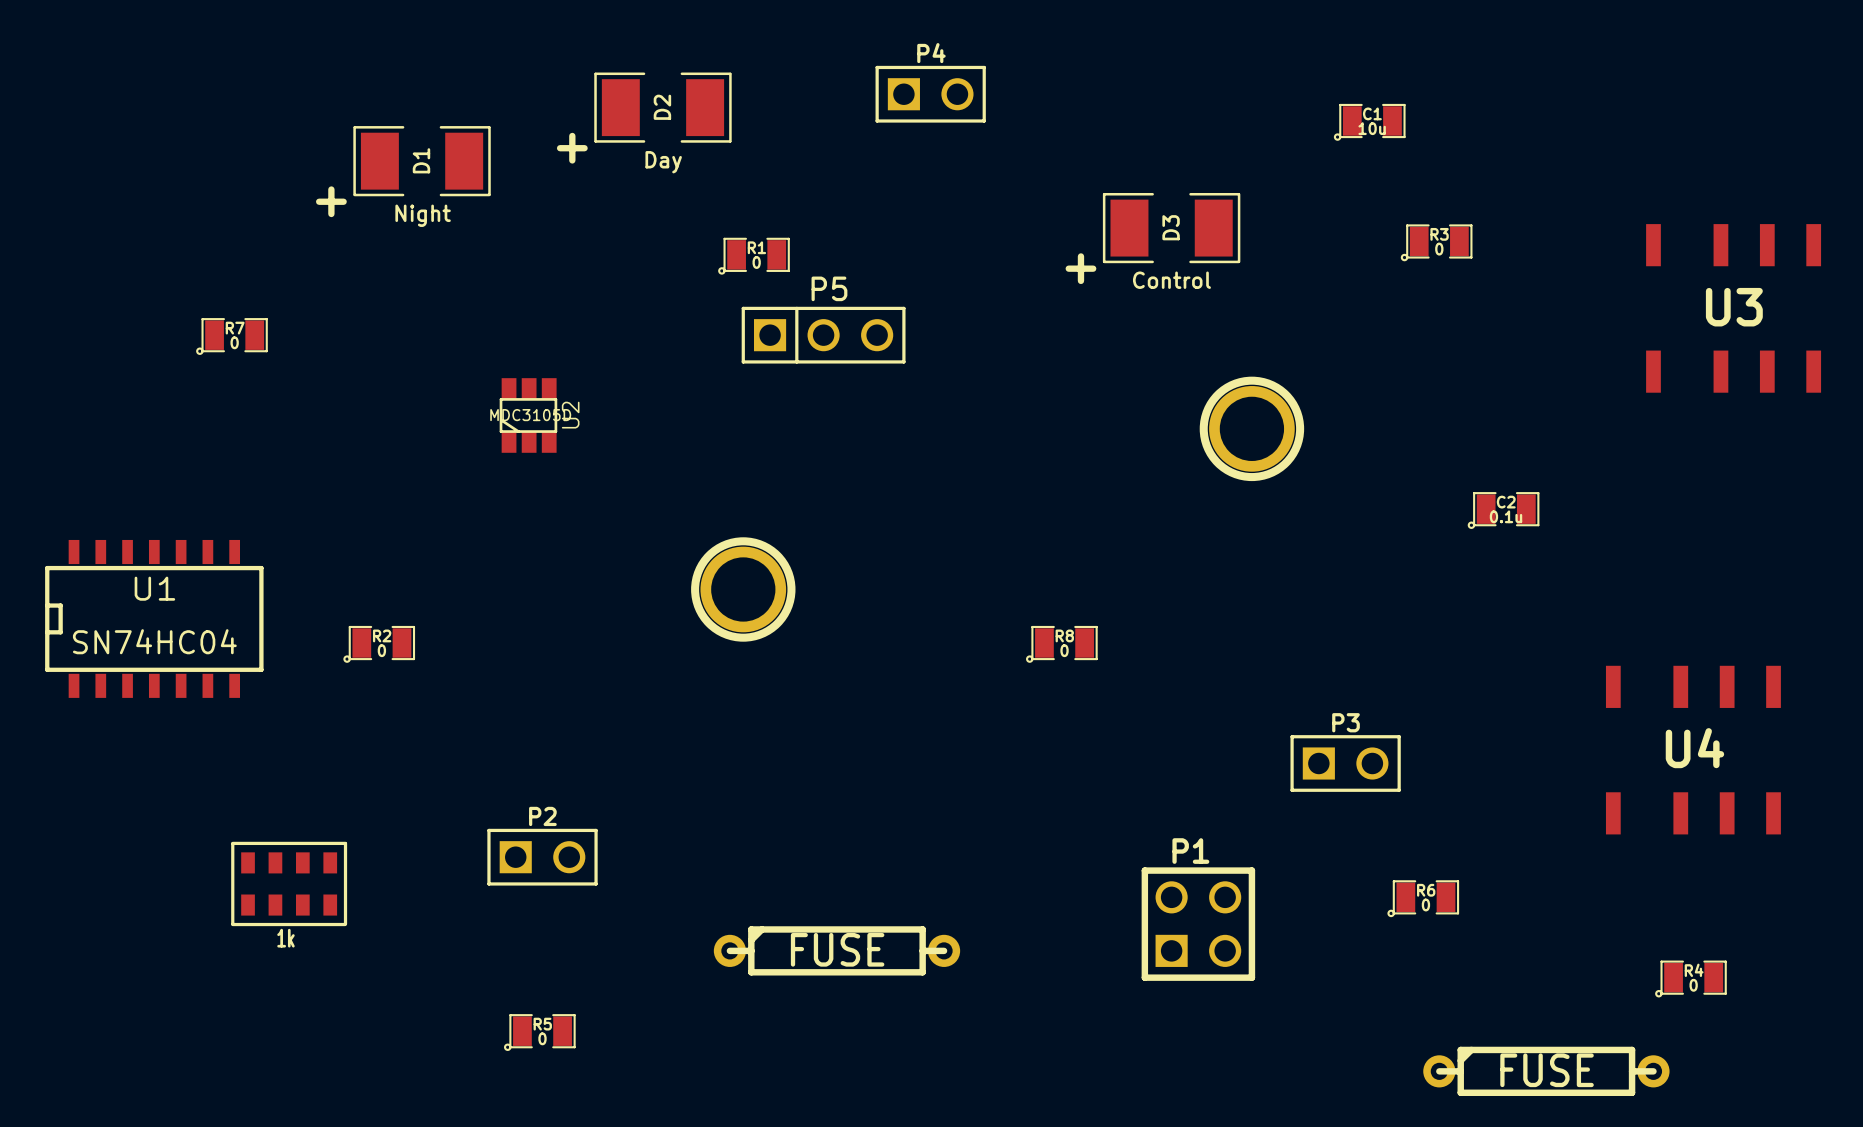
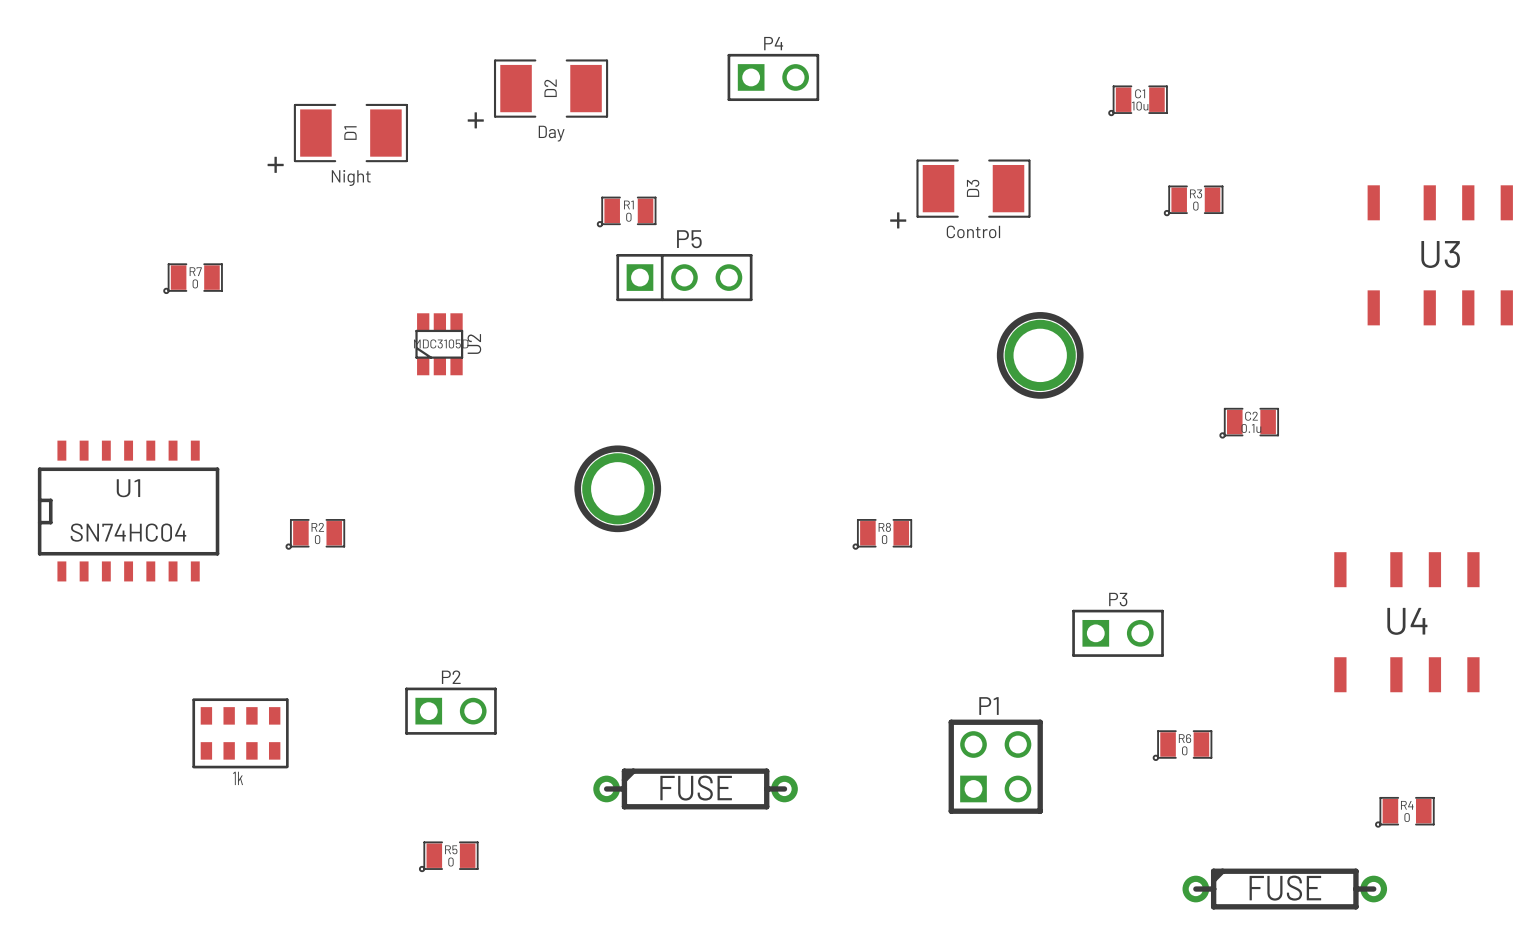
U1 footprint: [45, 539, 264, 698] -> [37, 440, 220, 582]

